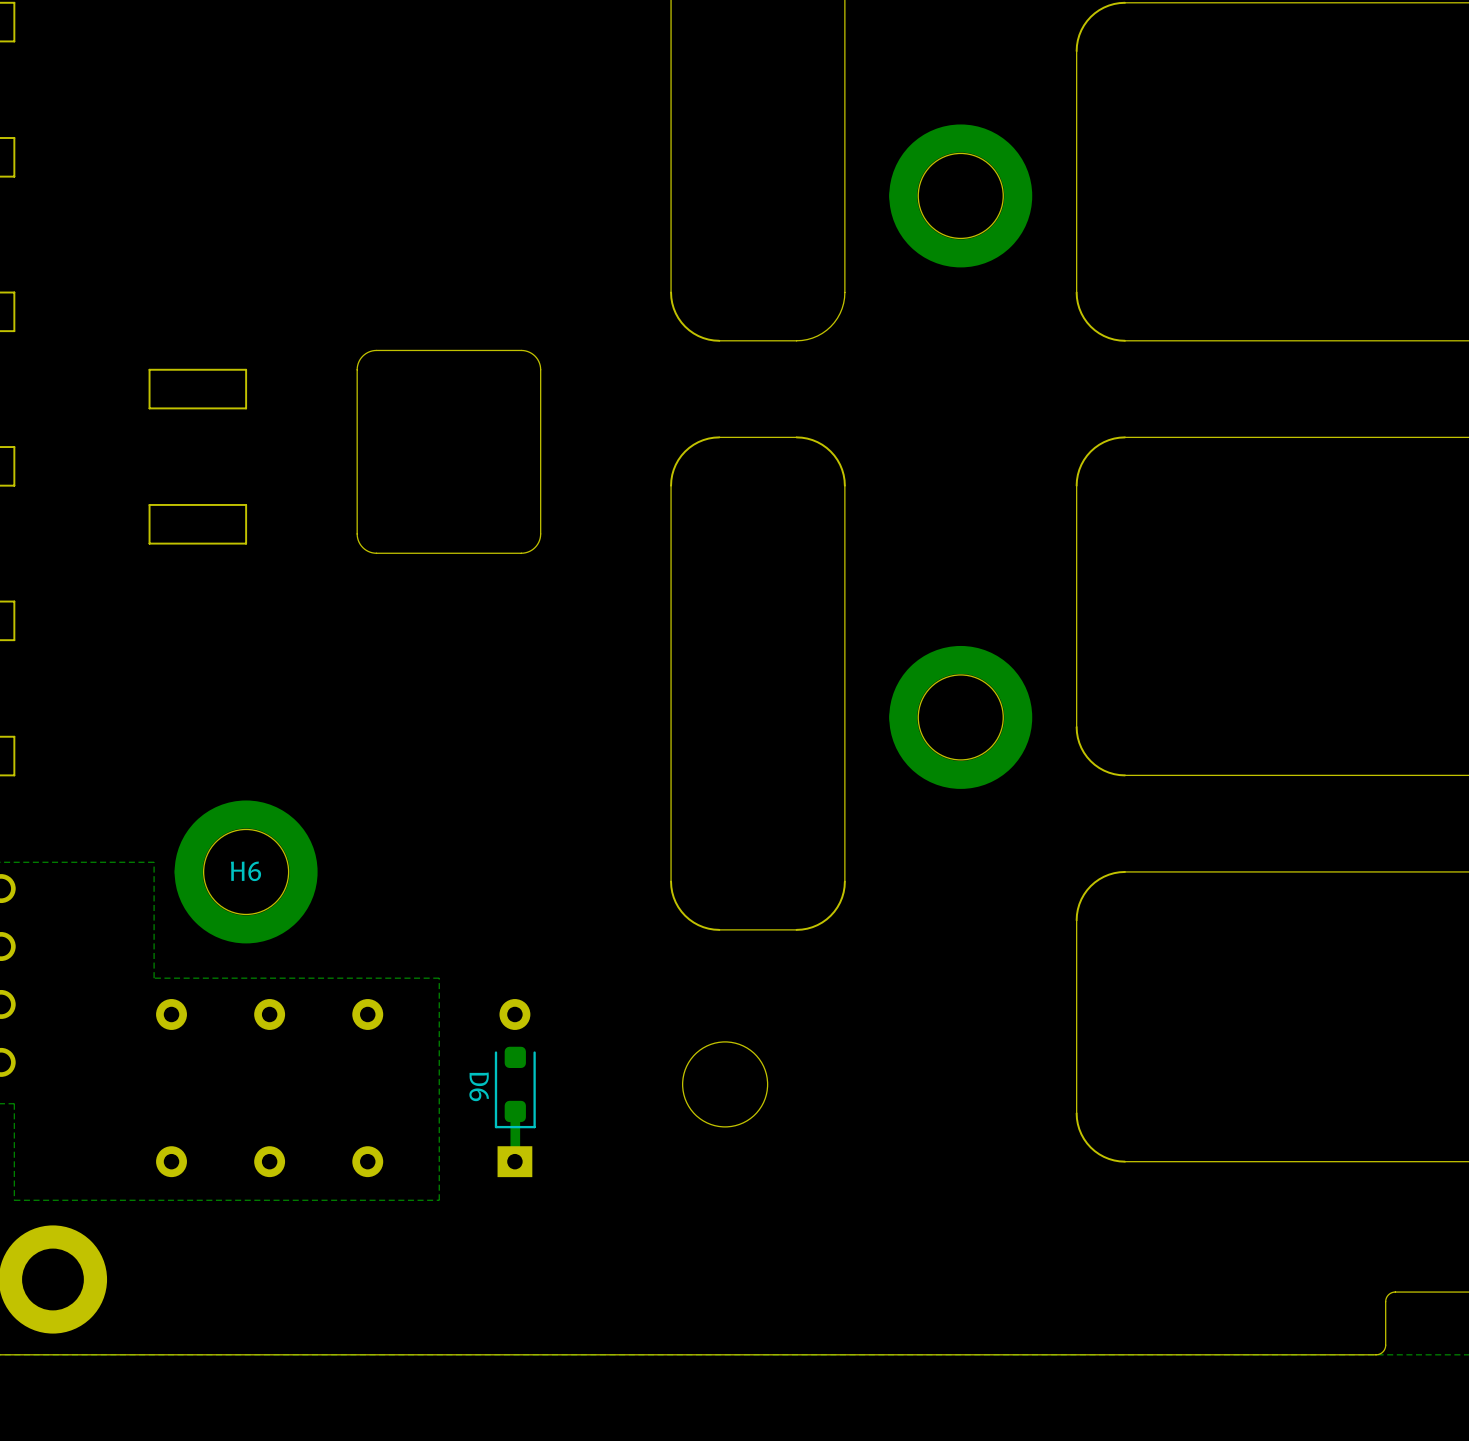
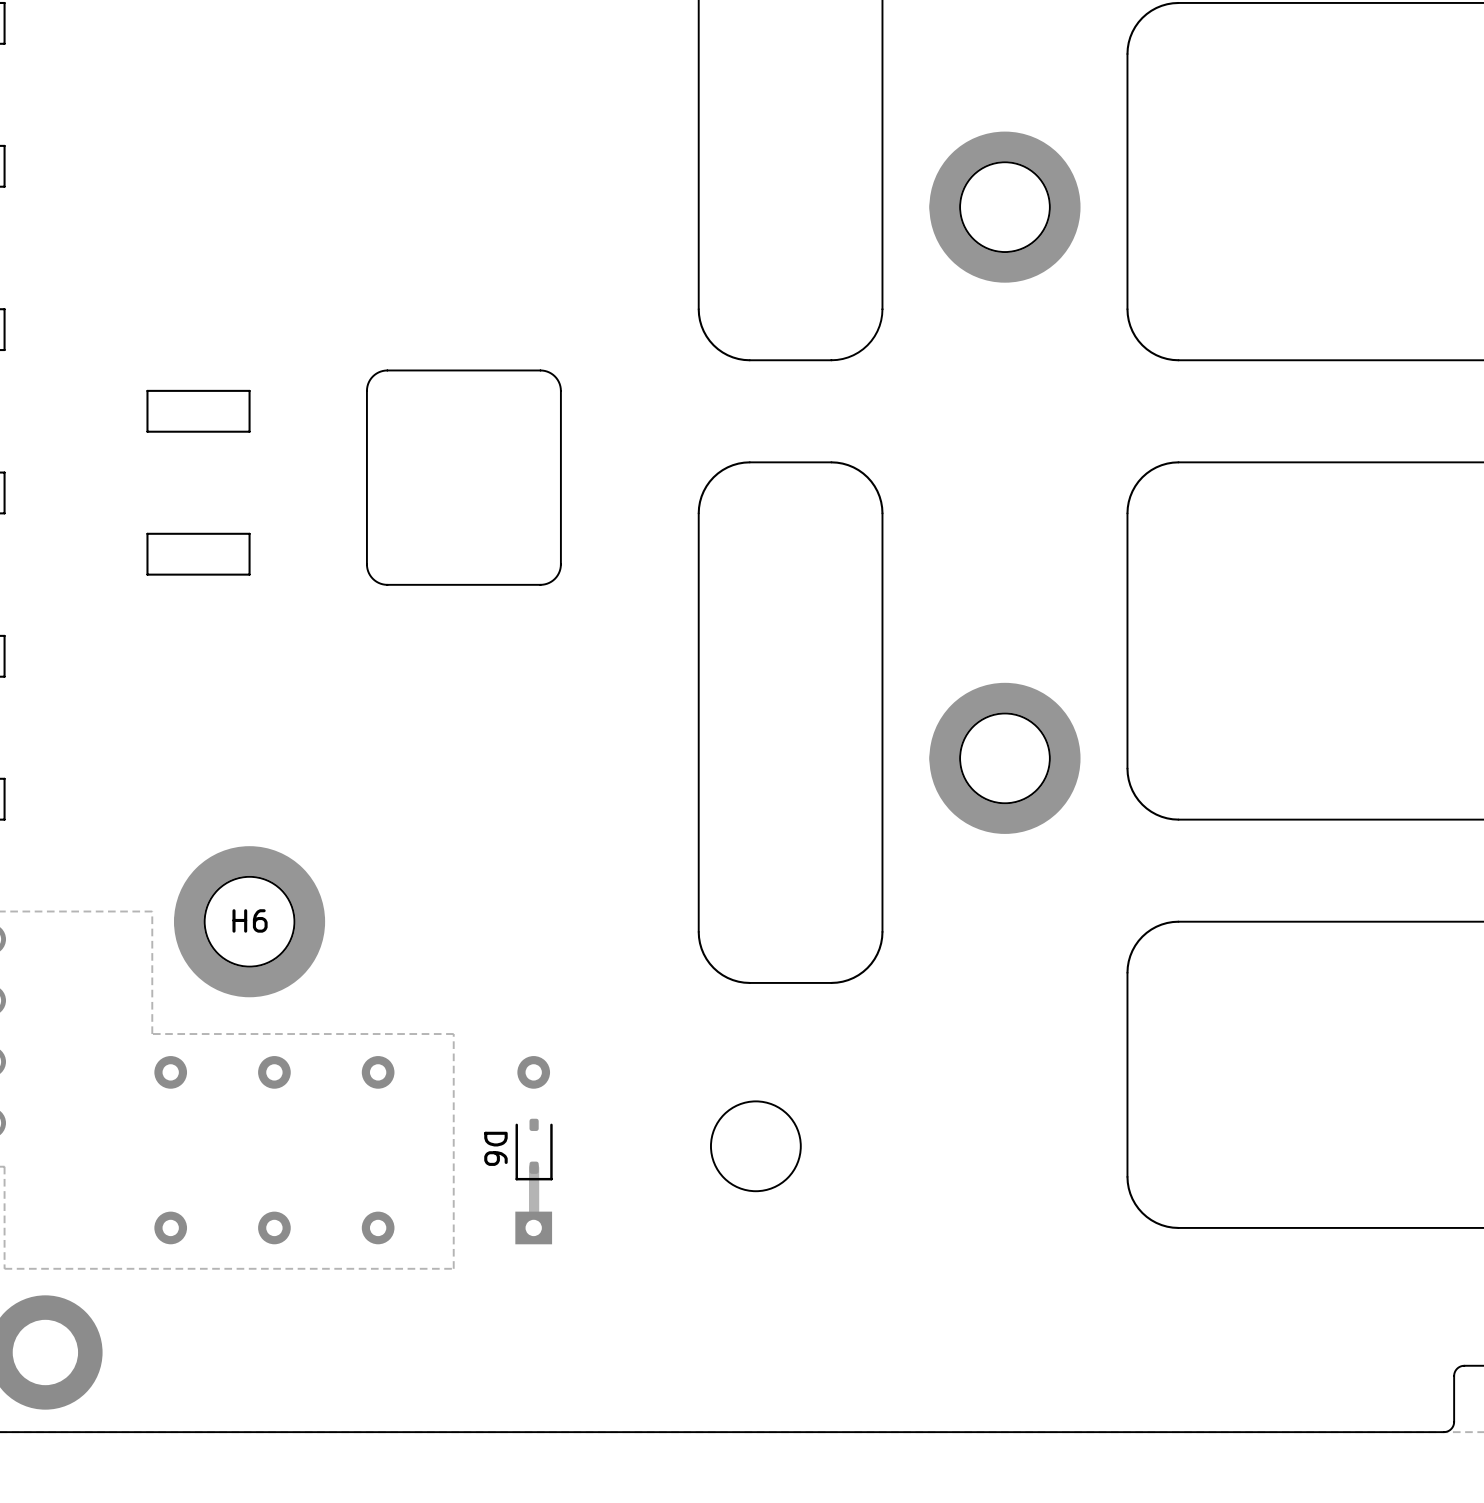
D6 footprint: [494, 1046, 536, 1129] -> [515, 1118, 553, 1181]

